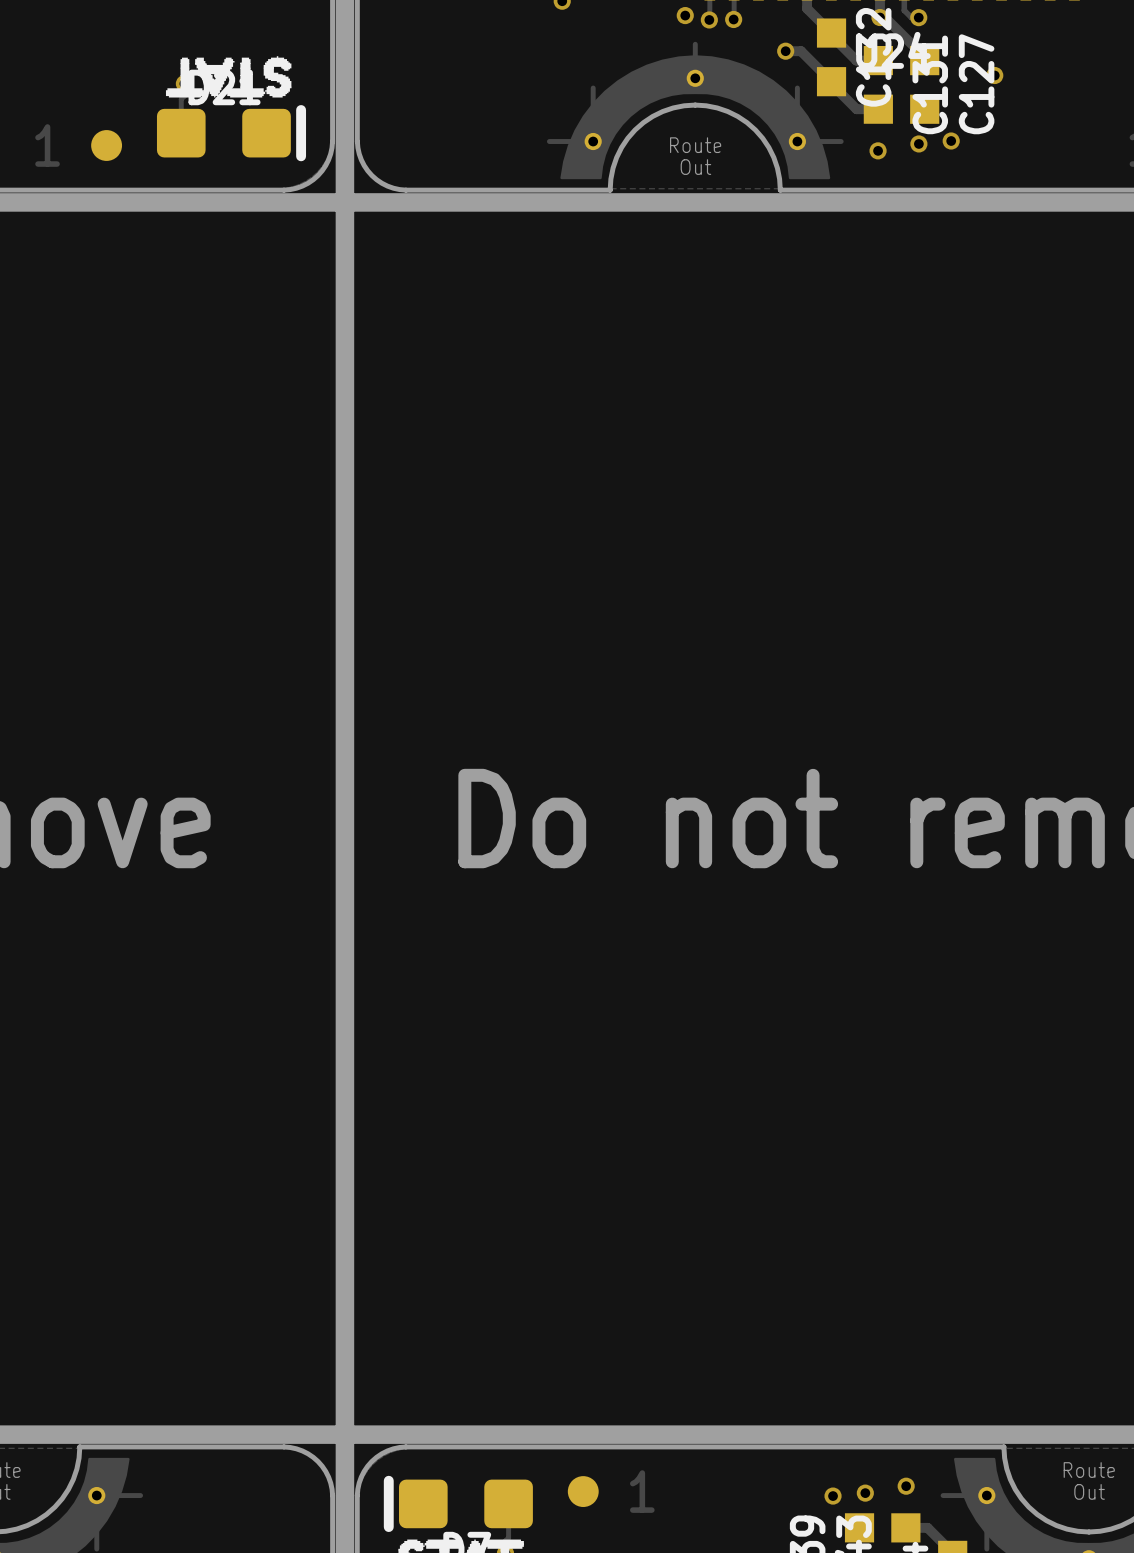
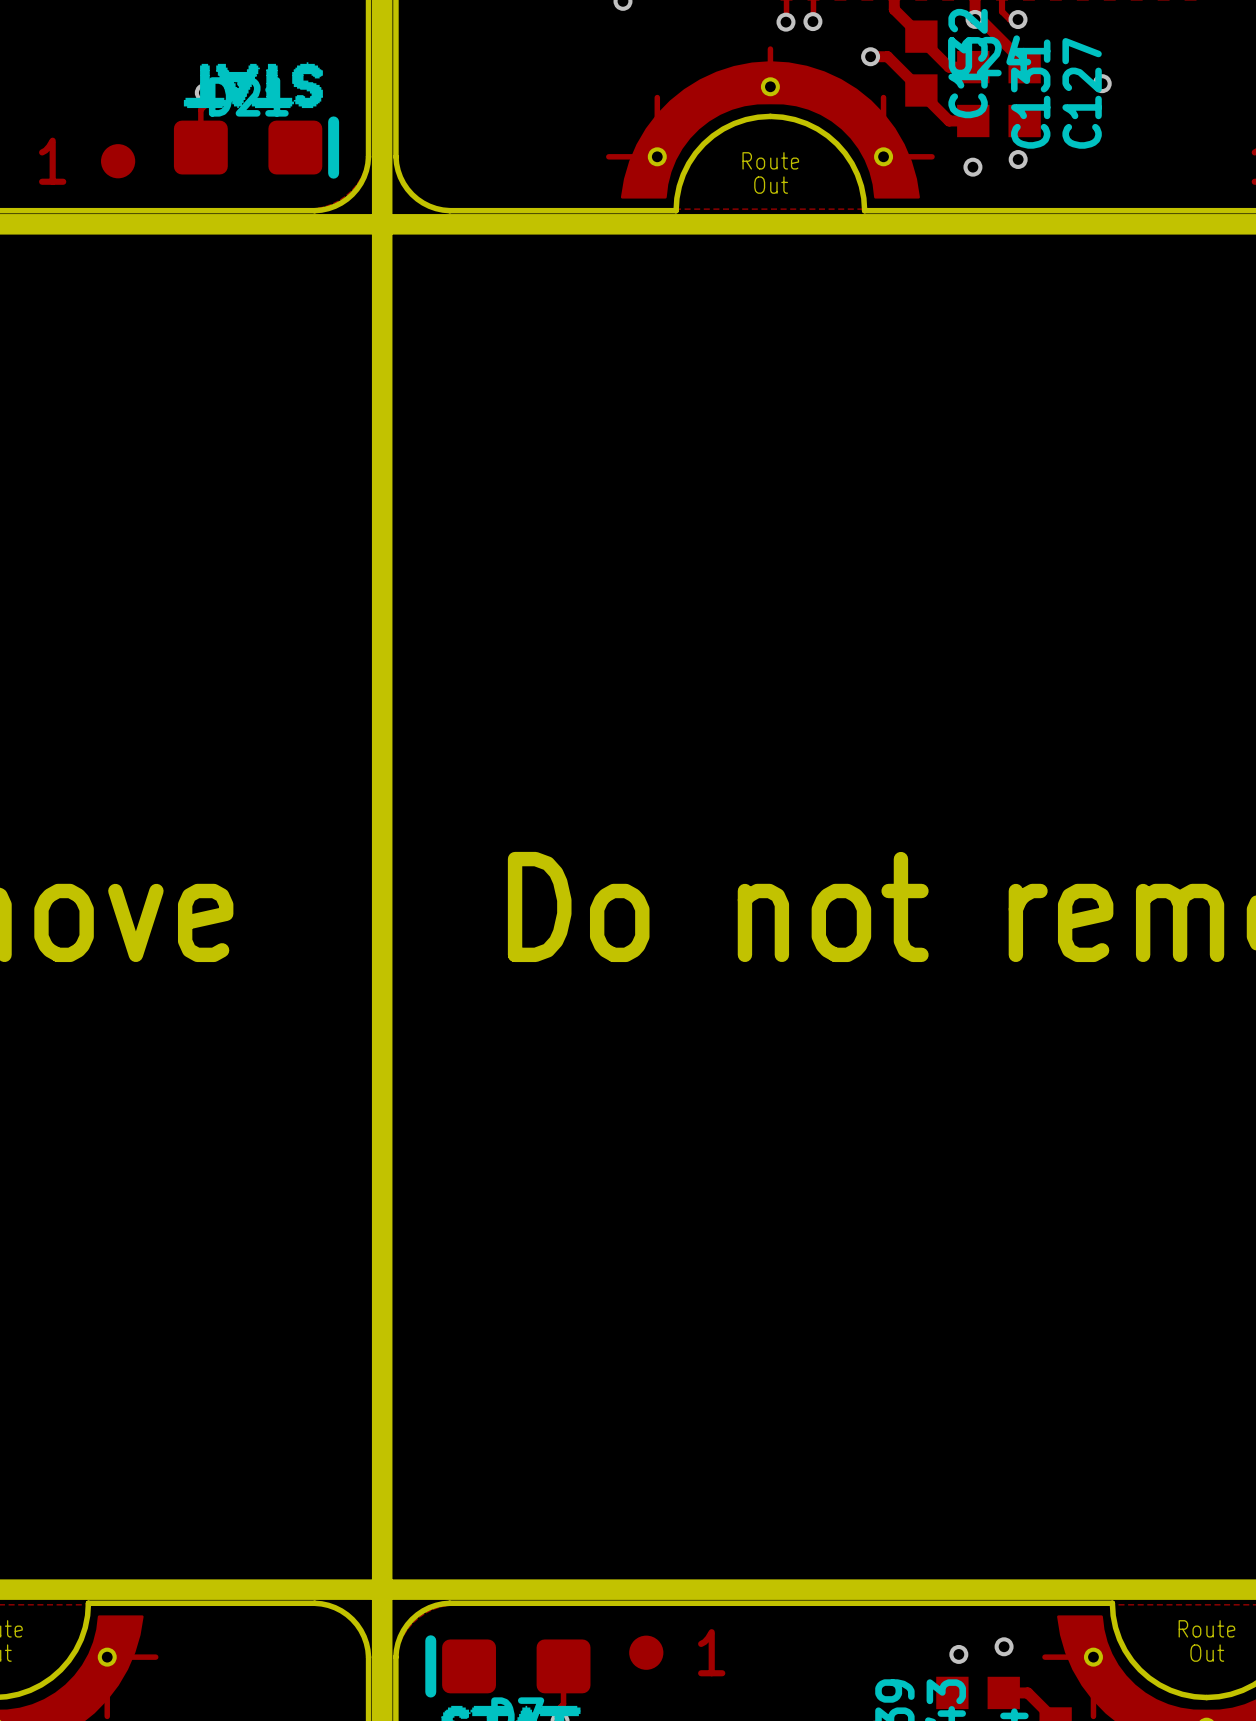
via: (685, 15) -> none
via: (951, 141) -> none
via: (833, 1496) -> none

